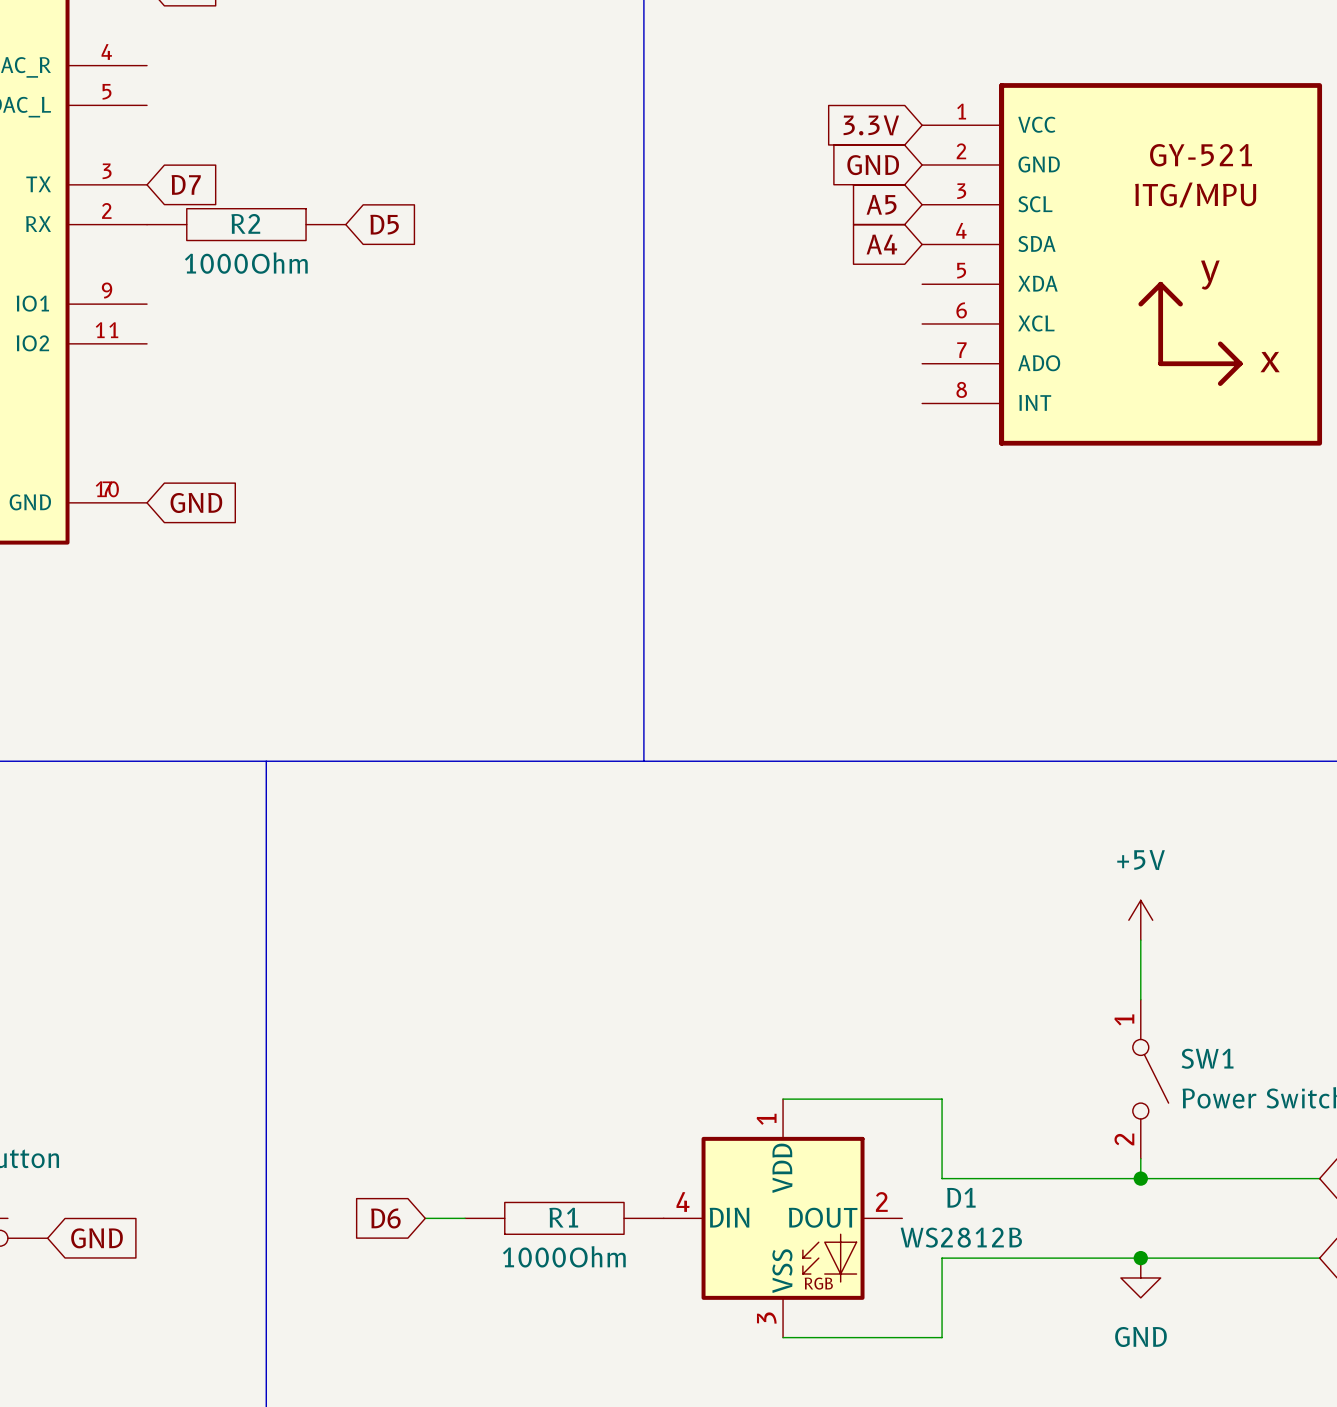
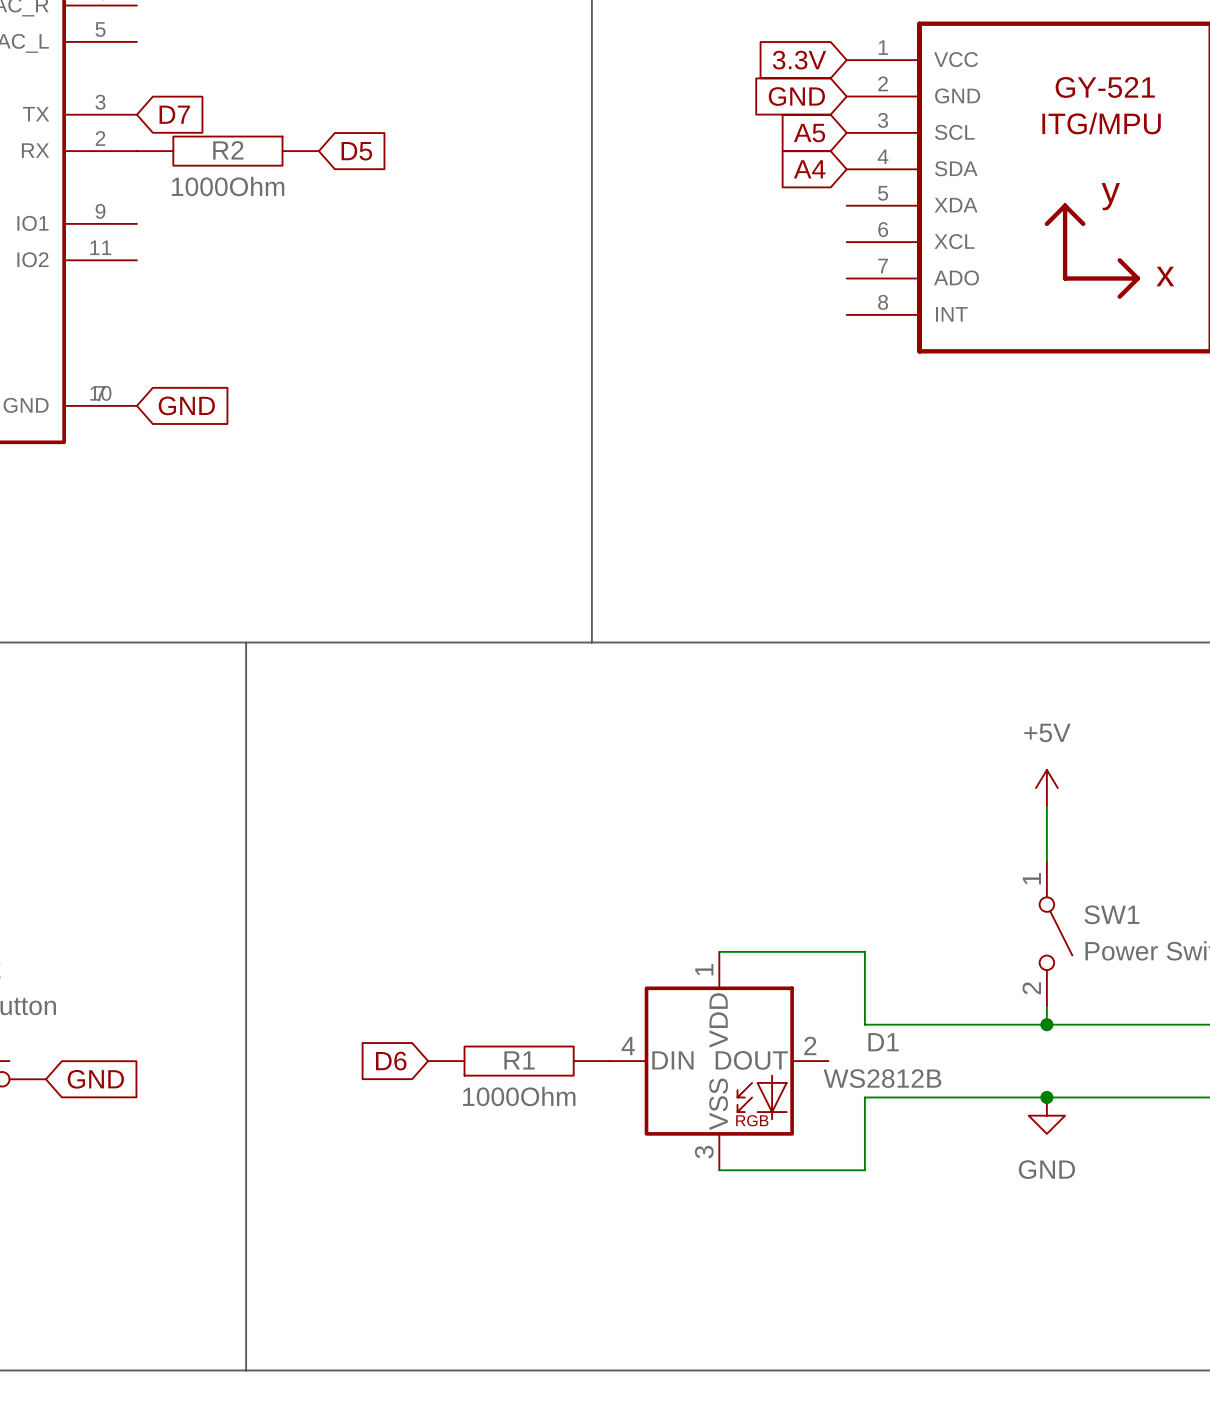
global label position: D6 (385, 1218) -> D6 (391, 1061)
wire: (425, 1218) (465, 1218) -> none

